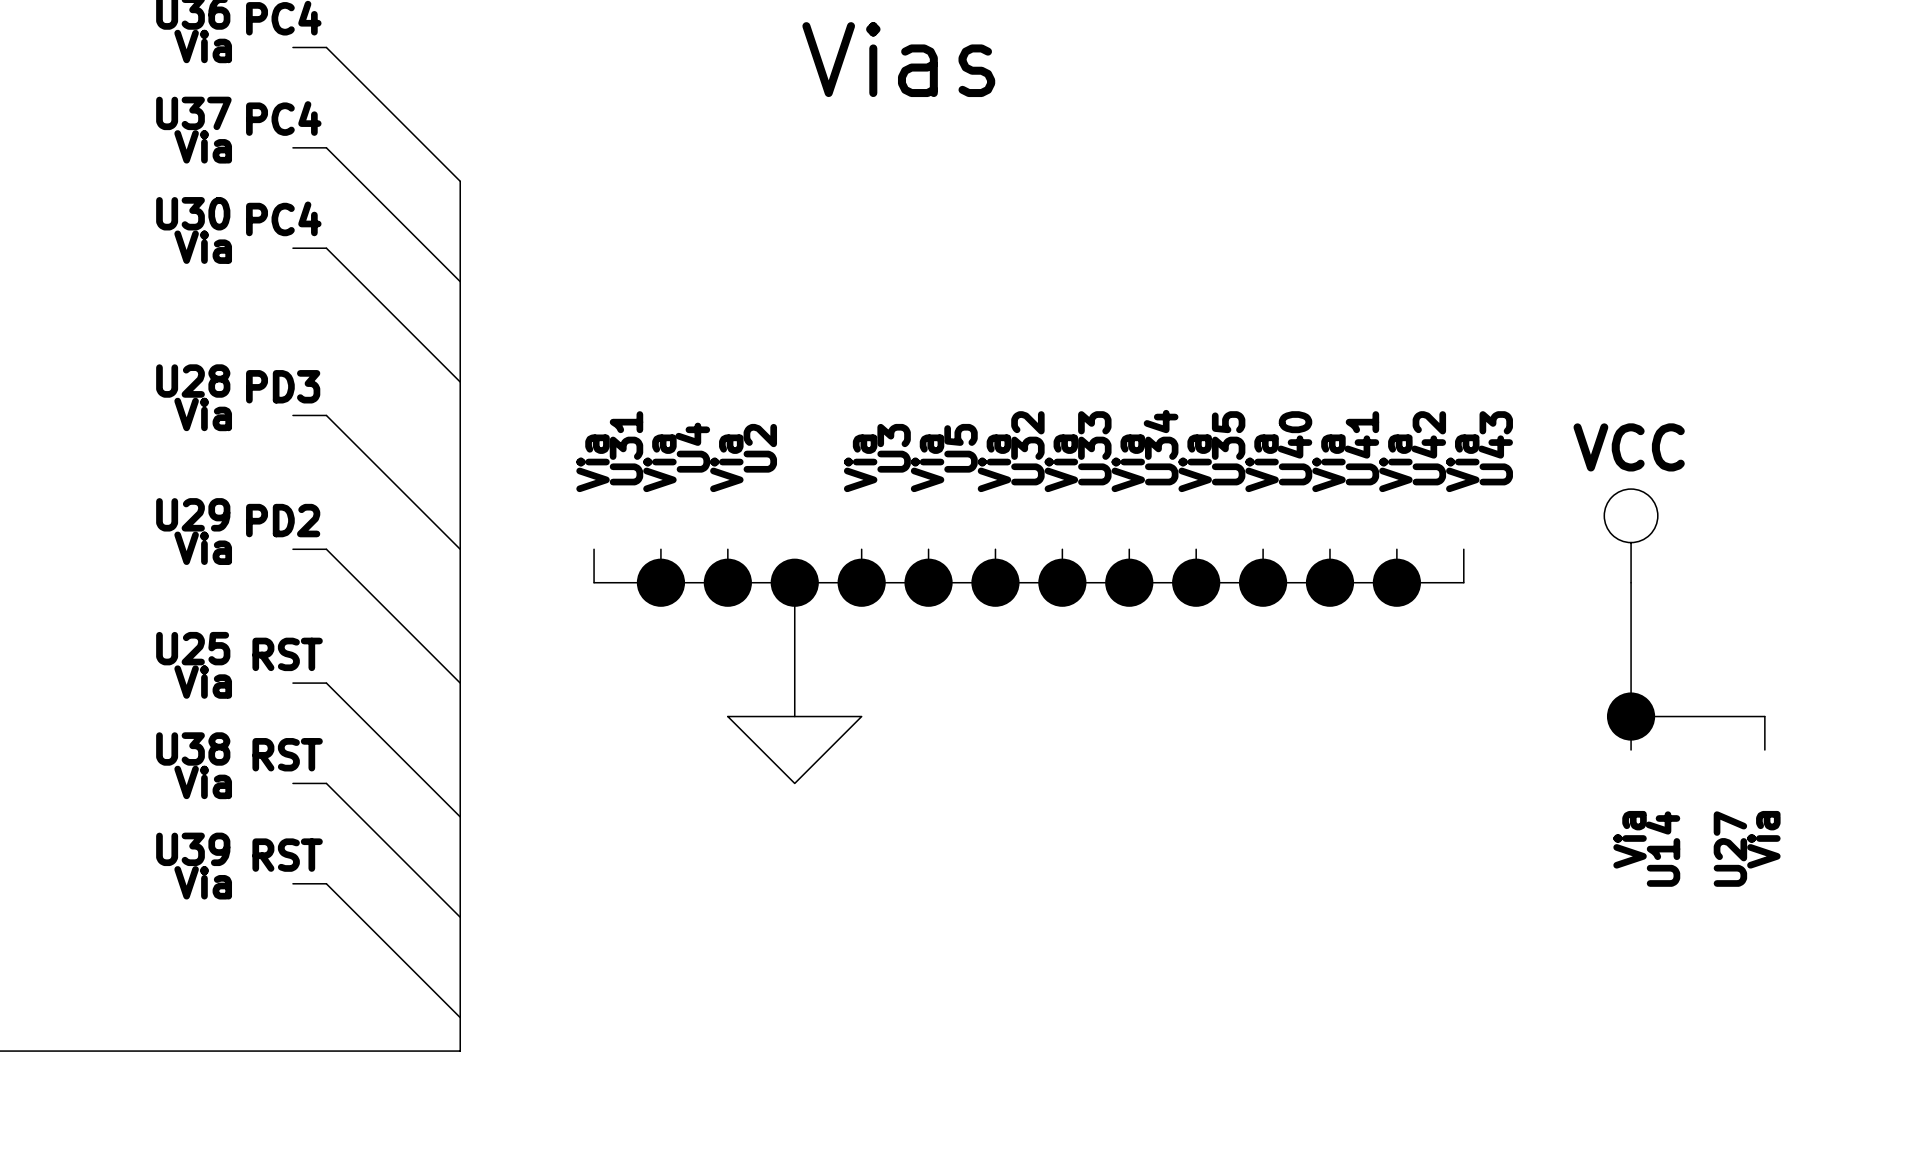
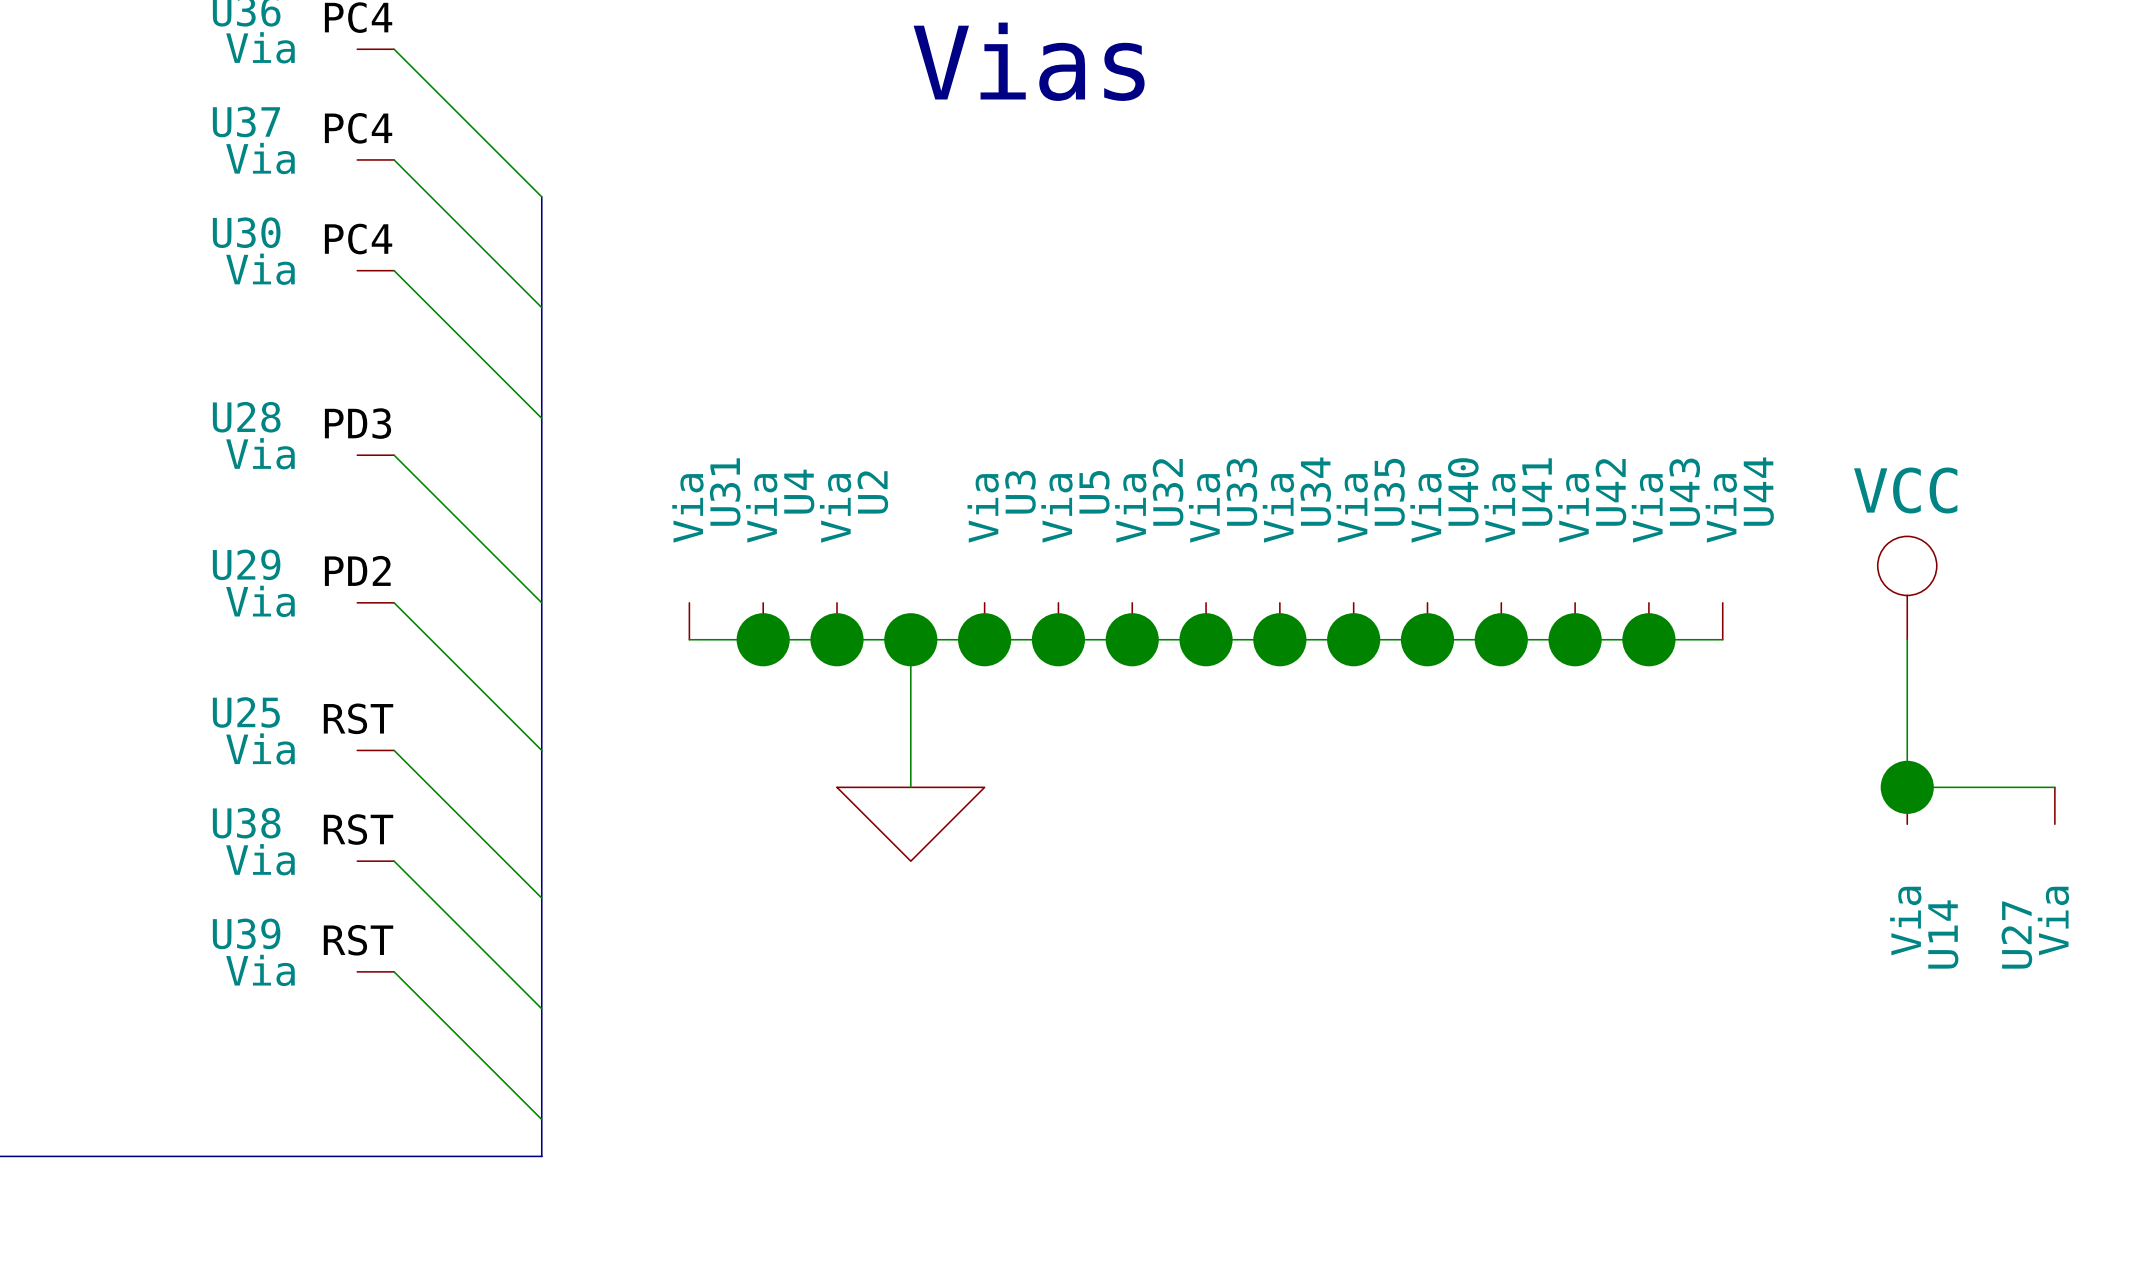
power symbol position: VCC (1631, 535) -> VCC (1907, 588)
U44: none -> (1722, 621)
wire: none -> (1648, 639) (1722, 639)
junction: none -> (1648, 639)
wire: (1631, 582) (1631, 716) (1697, 716) -> (1907, 639) (1907, 787)
junction position: (1631, 716) -> (1907, 787)
wire: none -> (1981, 787) (2054, 787)
U14 position: (1631, 733) -> (1907, 805)
U27 position: (1764, 733) -> (2054, 805)

